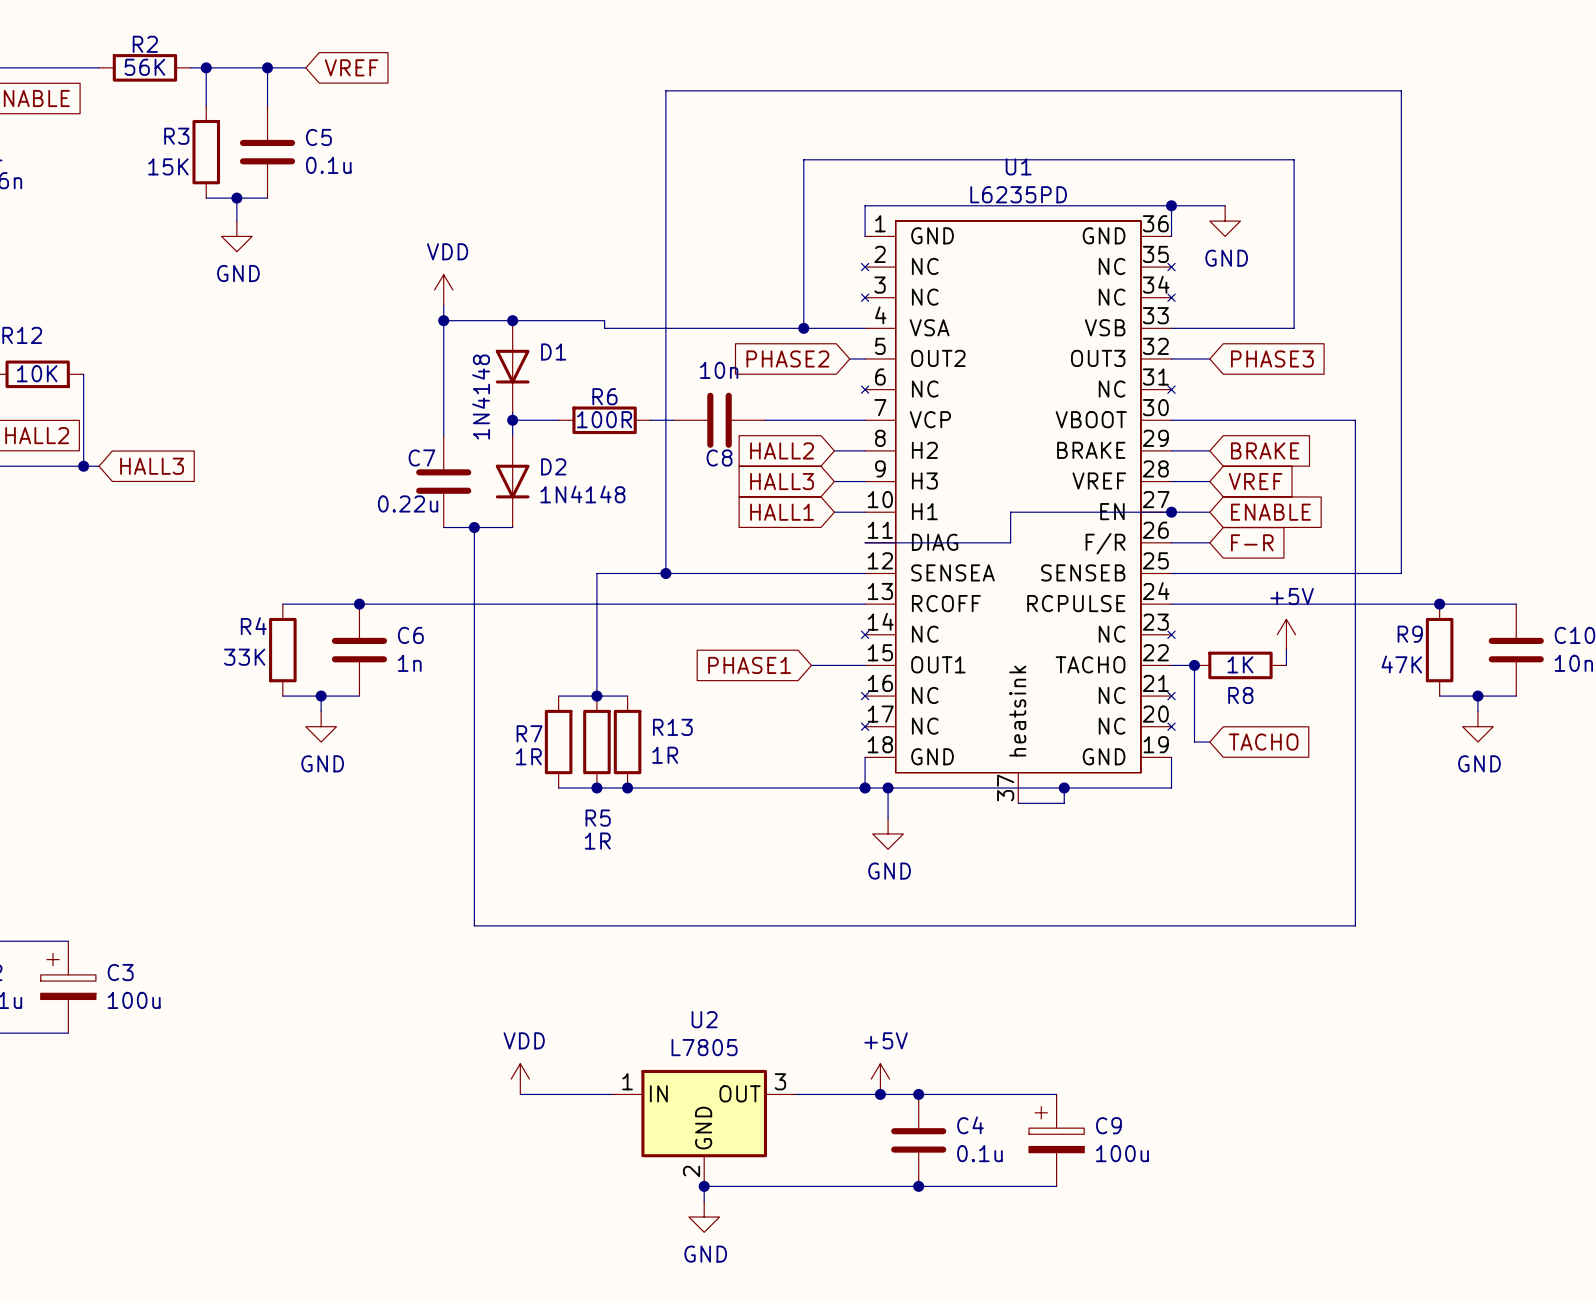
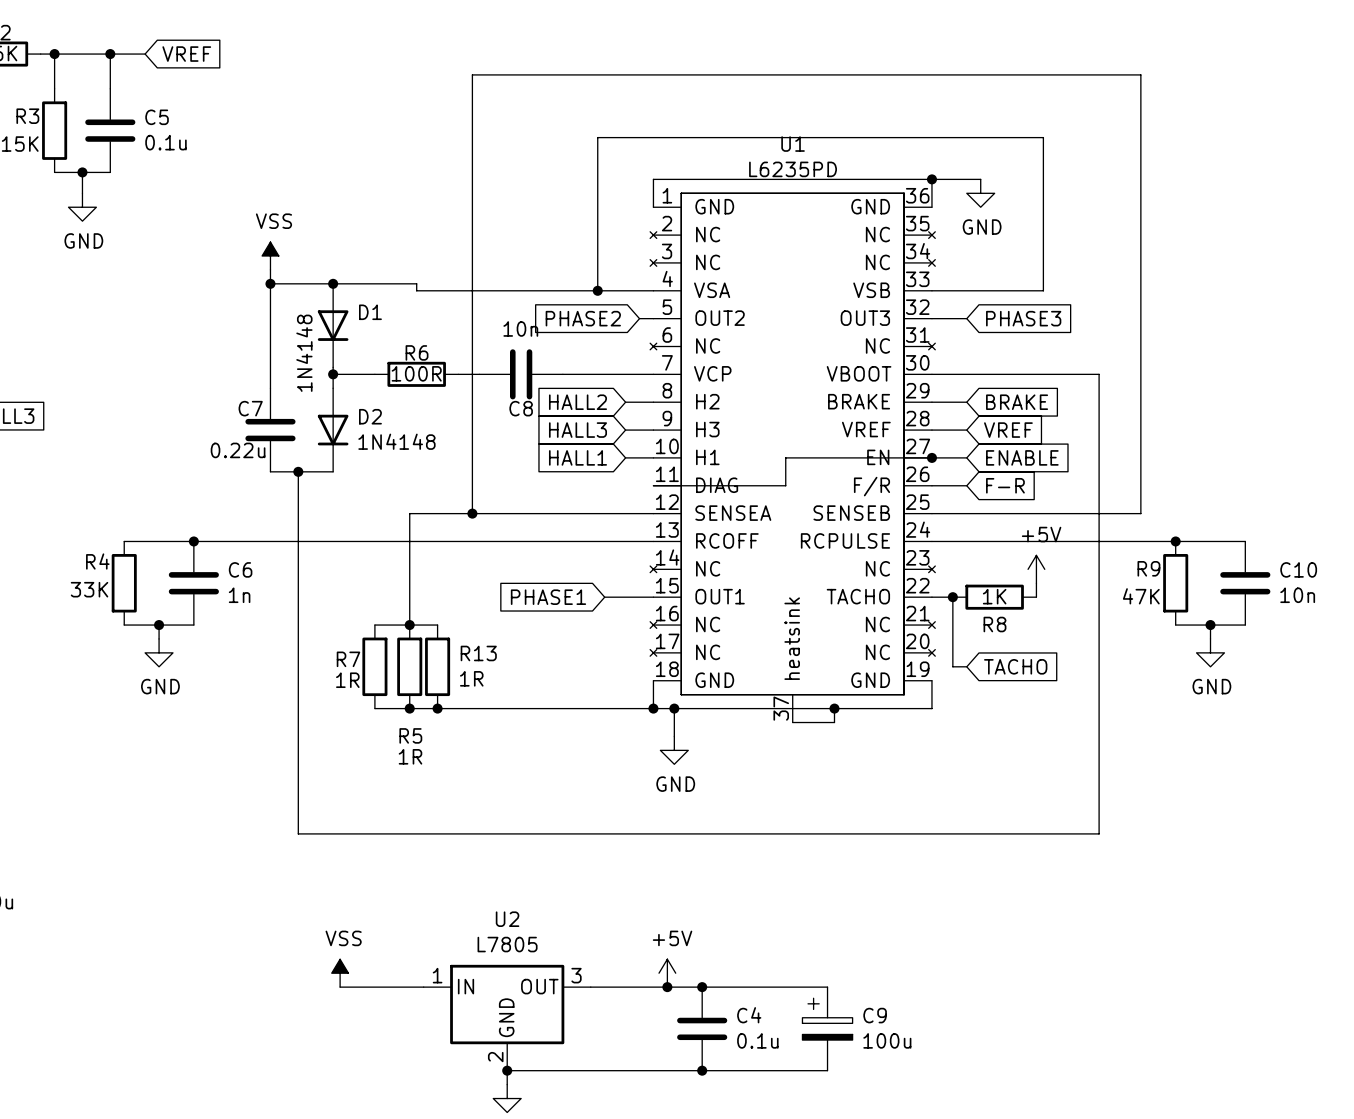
power symbol: VDD (443, 290) -> VSS (270, 255)
power symbol: VDD (520, 1079) -> VSS (340, 973)

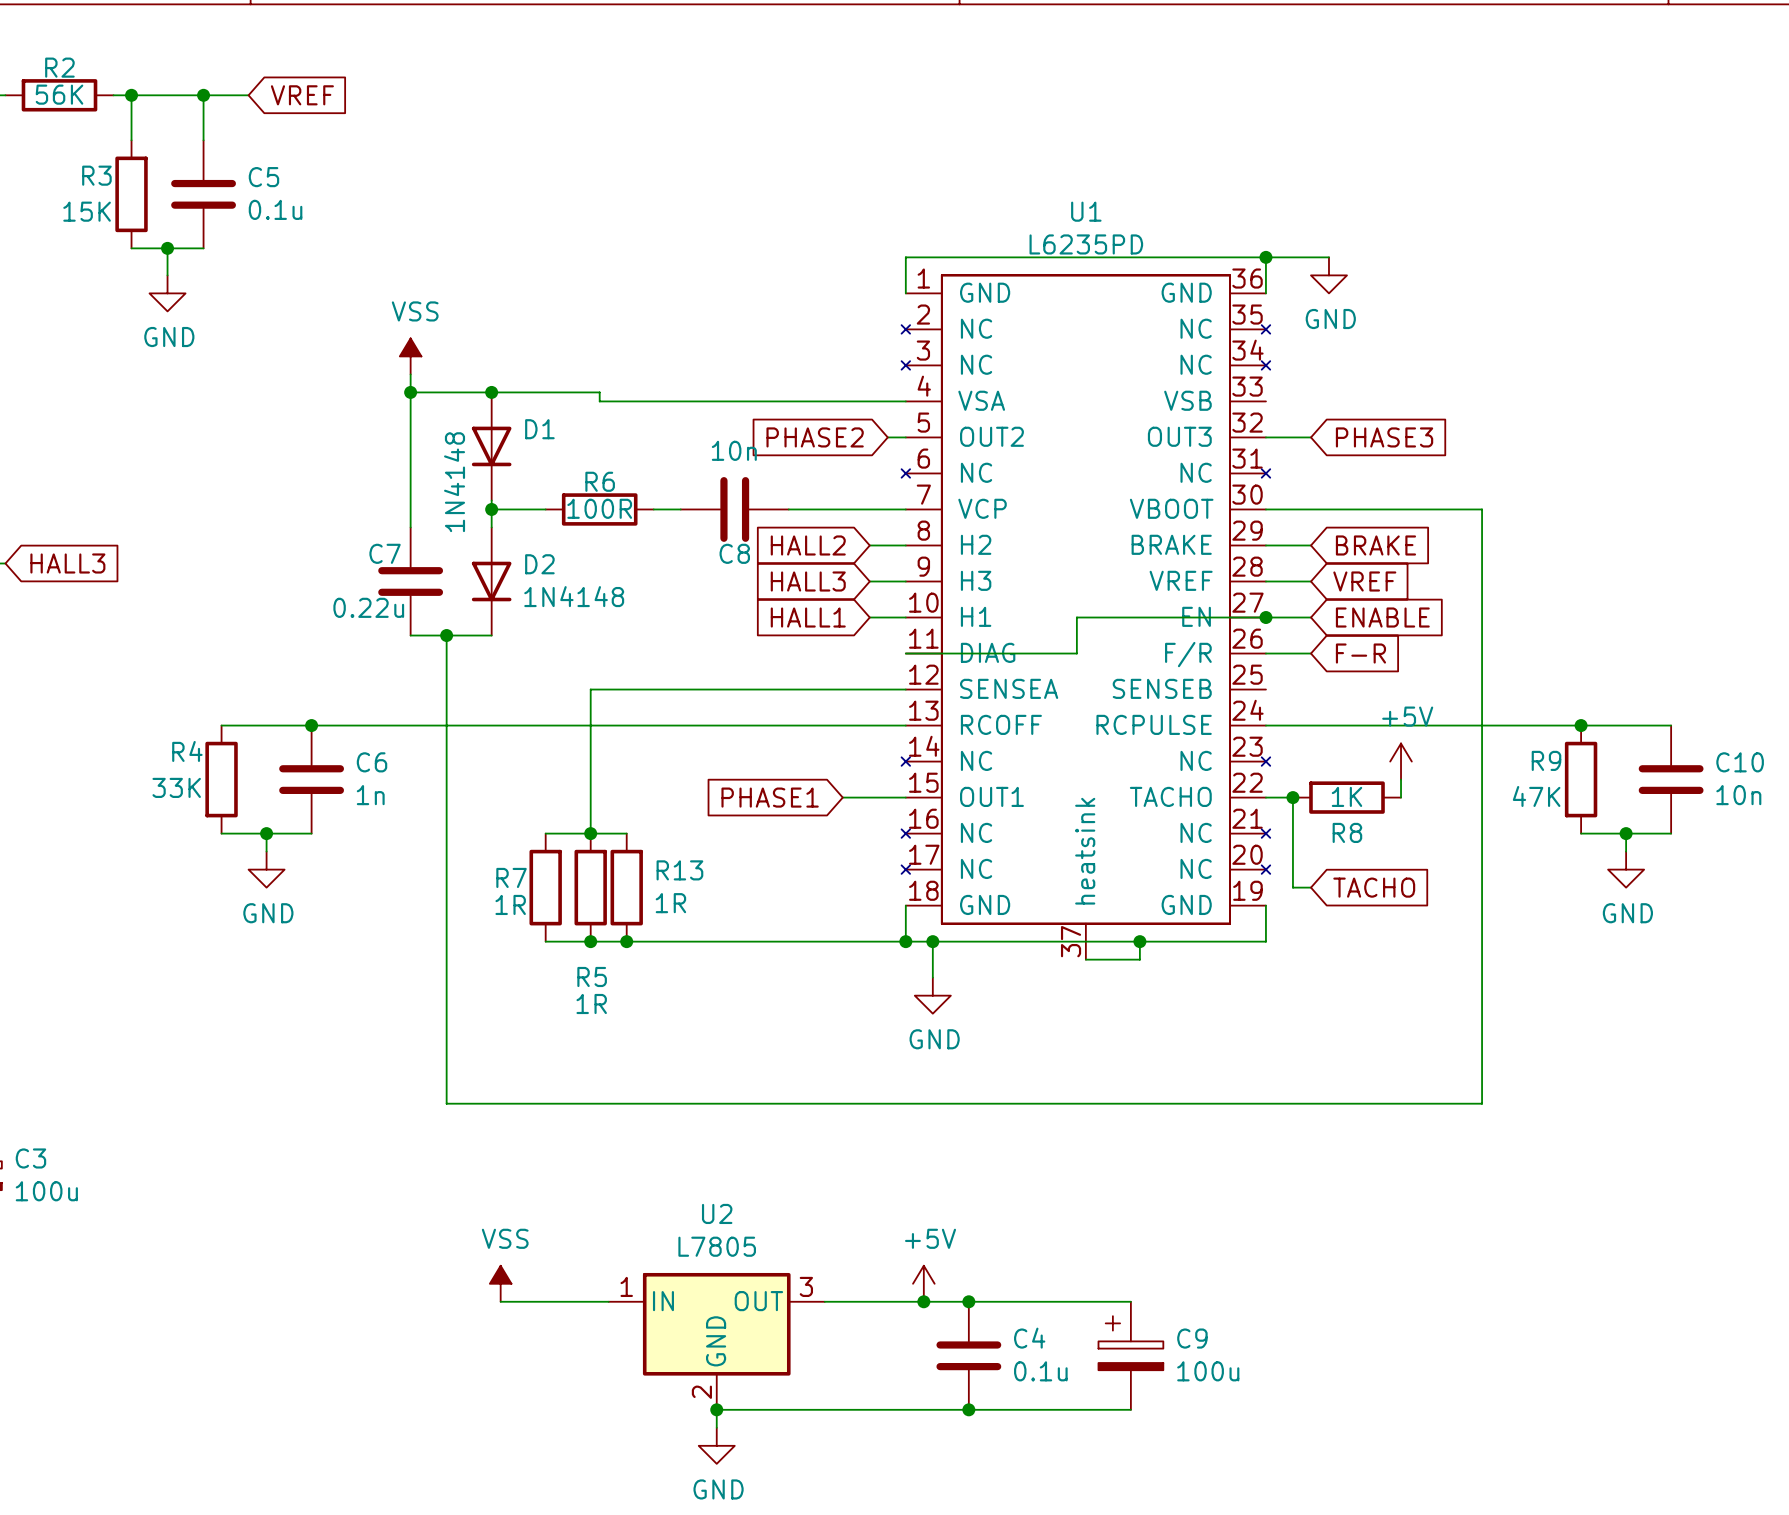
wire: (597, 290) (597, 137) (1043, 137) (1043, 290) (931, 290) -> none
junction: (597, 290) -> none
wire: (472, 513) (472, 74) (1140, 74) (1140, 513) (931, 513) -> none
junction: (472, 513) -> none

